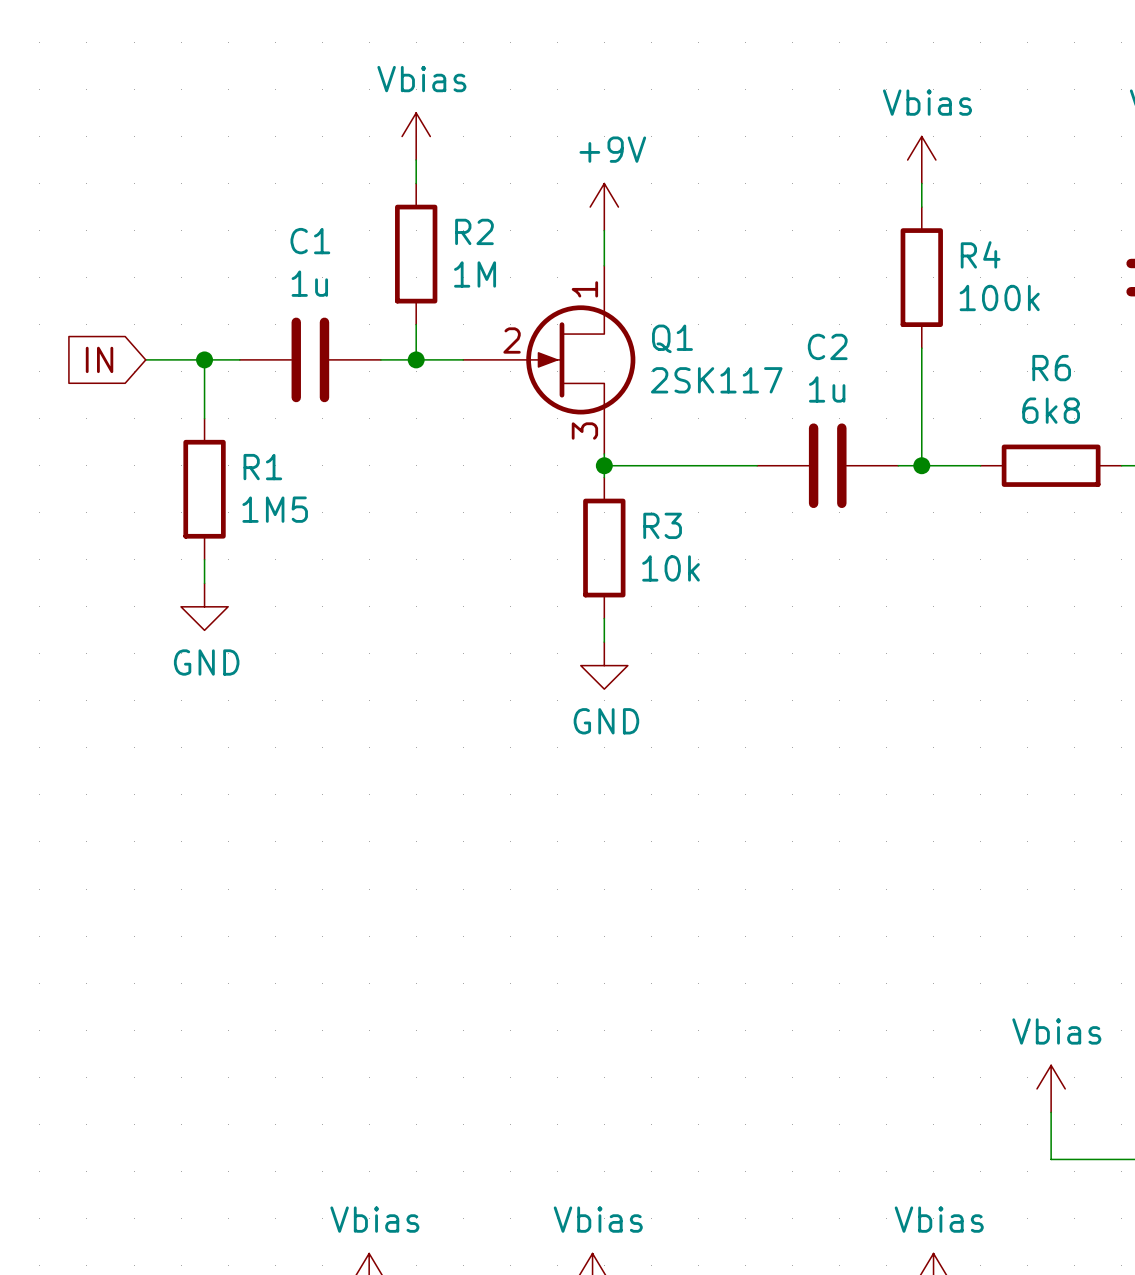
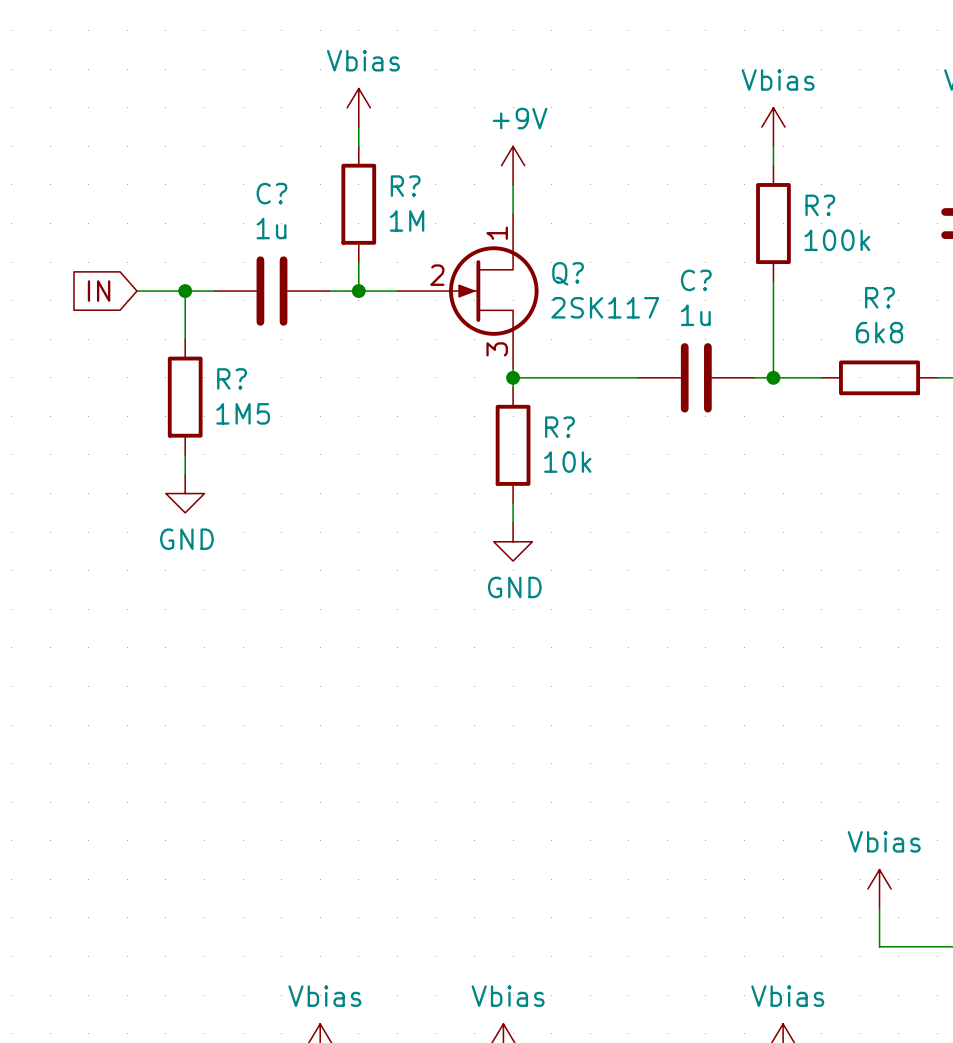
R2 name: R2 (474, 231) -> R? (405, 186)
C1 name: C1 (310, 241) -> C? (271, 193)
R4 name: R4 (980, 254) -> R? (820, 205)
Q1 name: Q1 (672, 338) -> Q? (568, 273)
C2 name: C2 (827, 346) -> C? (696, 280)
R6 name: R6 (1051, 368) -> R? (879, 297)
R1 name: R1 (262, 467) -> R? (232, 378)
R3 name: R3 (662, 525) -> R? (559, 427)

